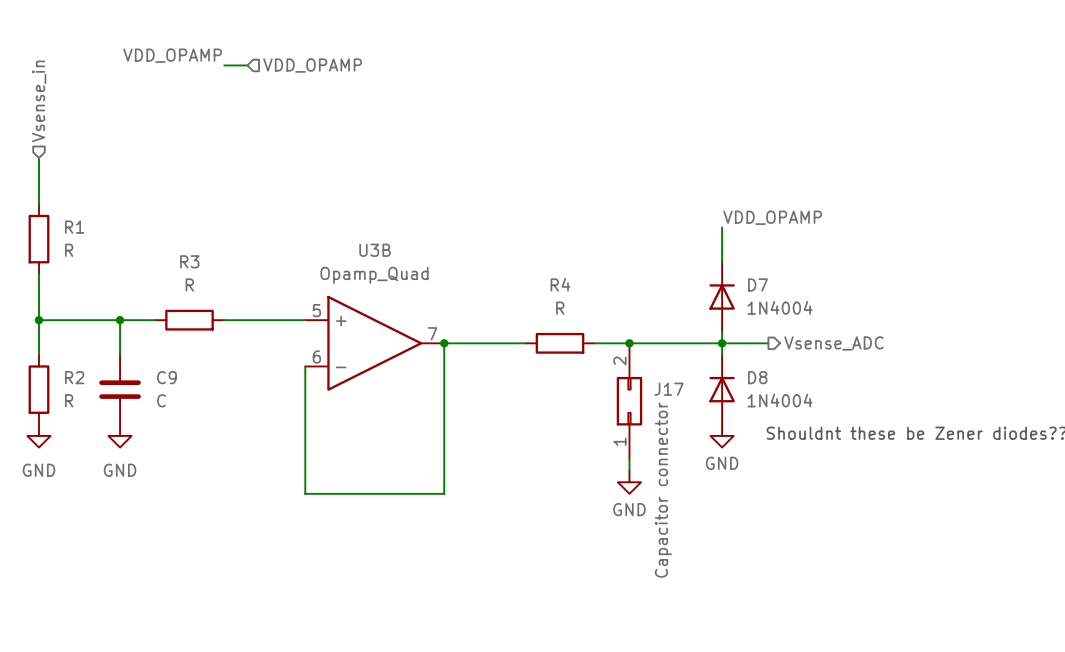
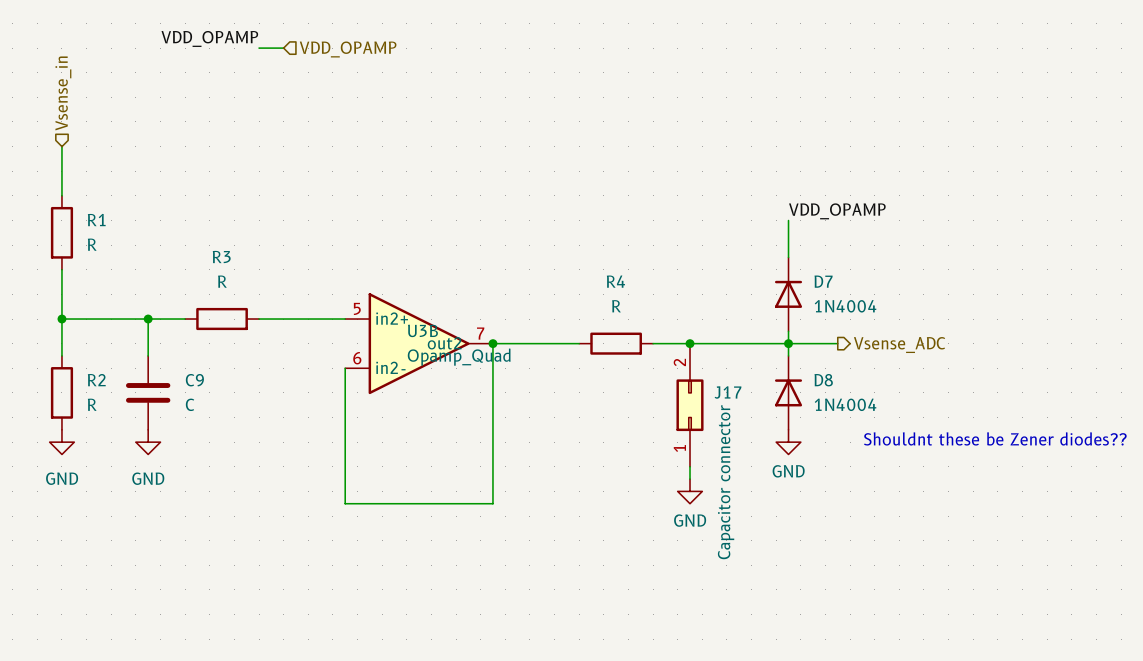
U3B name position: U3B (375, 250) -> U3B (422, 330)
U3B value position: Opamp_Quad (374, 275) -> Opamp_Quad (459, 357)
U3B pin name: + (341, 321) -> in2+ (392, 318)
U3B pin name: none -> out2 (444, 343)
U3B pin name: - (341, 367) -> in2- (390, 367)

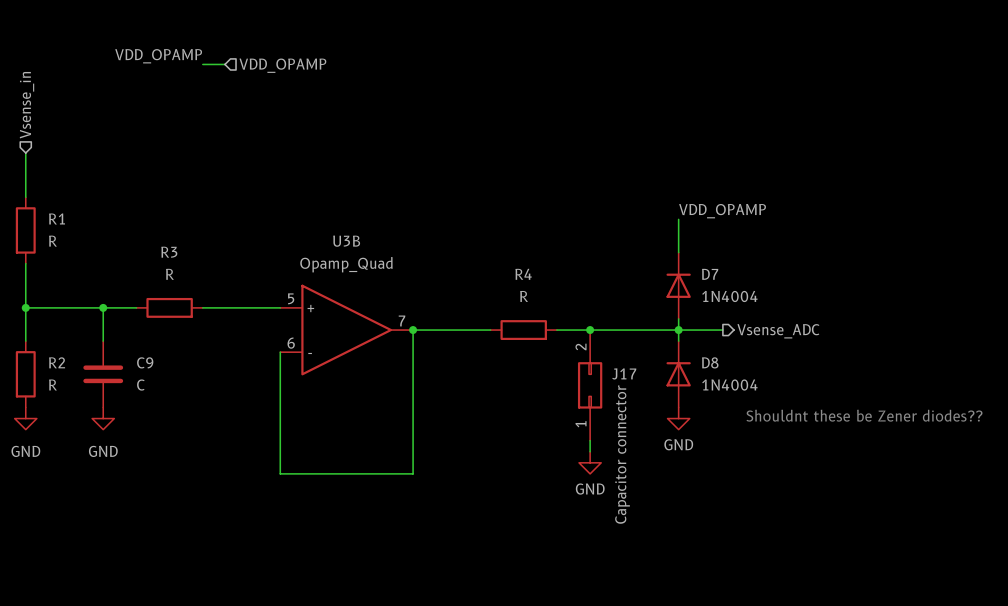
U3B pin name: in2+ (392, 318) -> + (310, 308)
U3B name position: U3B (422, 330) -> U3B (346, 241)
U3B pin name: out2 (444, 343) -> none
U3B value position: Opamp_Quad (459, 357) -> Opamp_Quad (346, 264)
U3B pin name: in2- (390, 367) -> - (310, 353)

